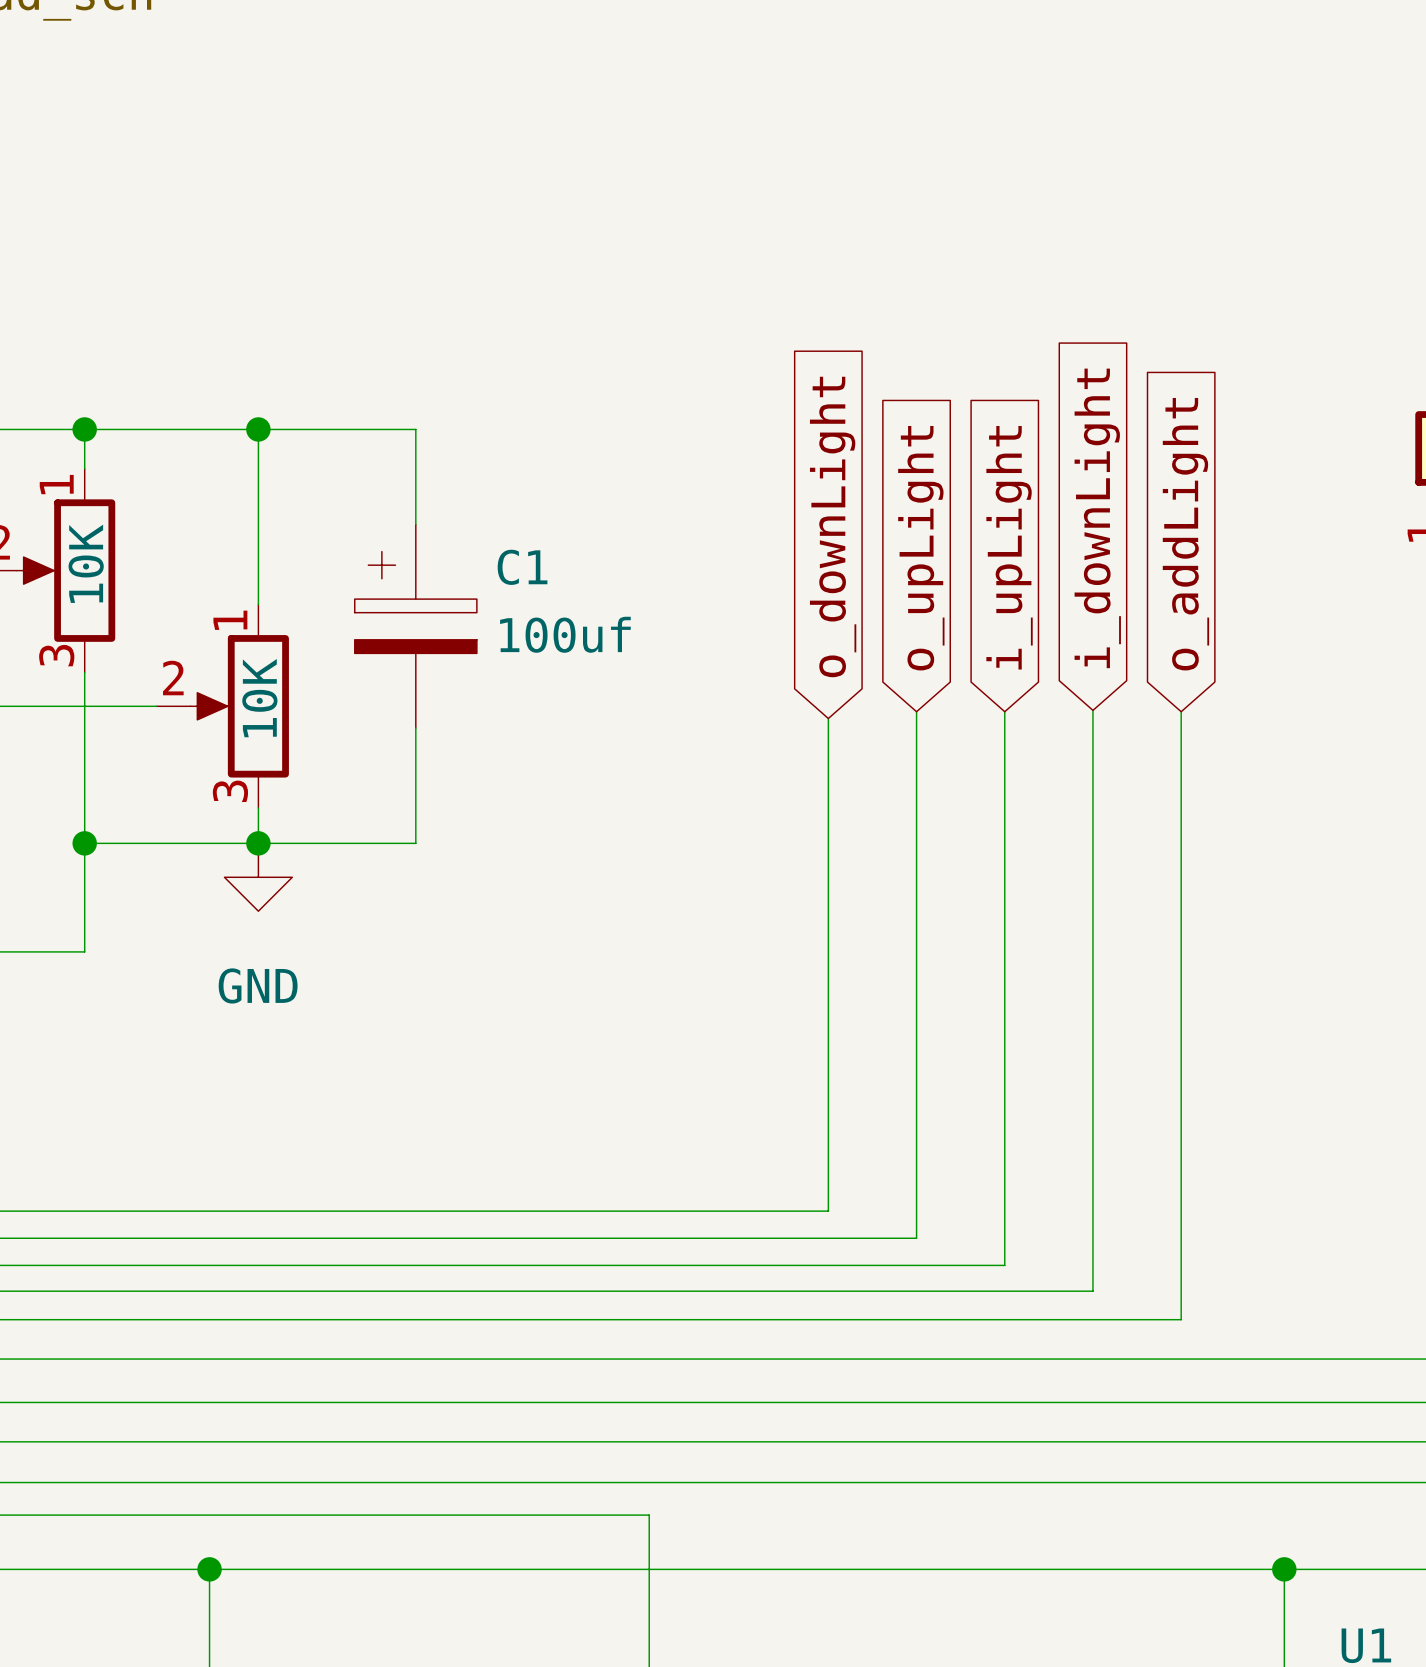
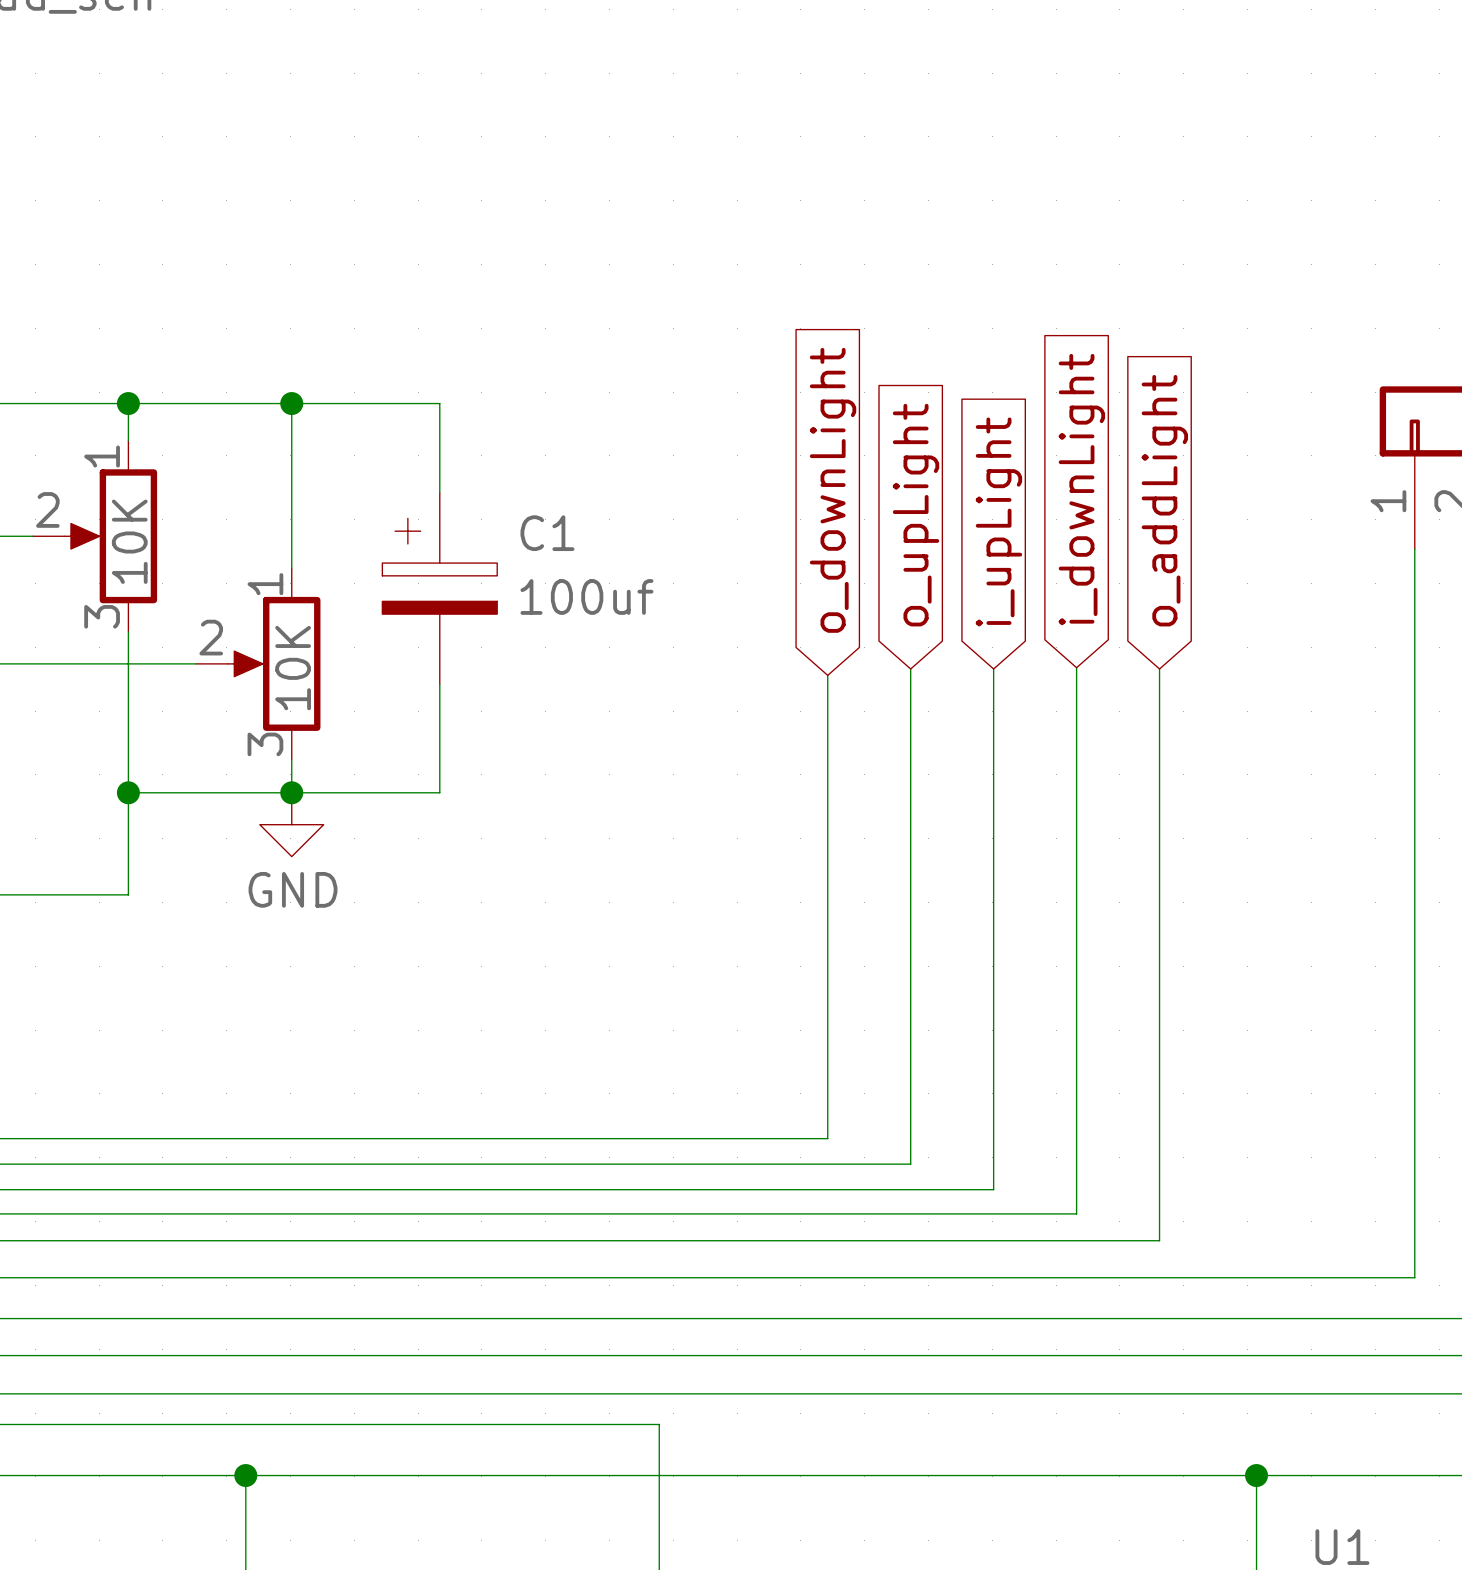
power symbol text position: GND (258, 985) -> GND (293, 889)

